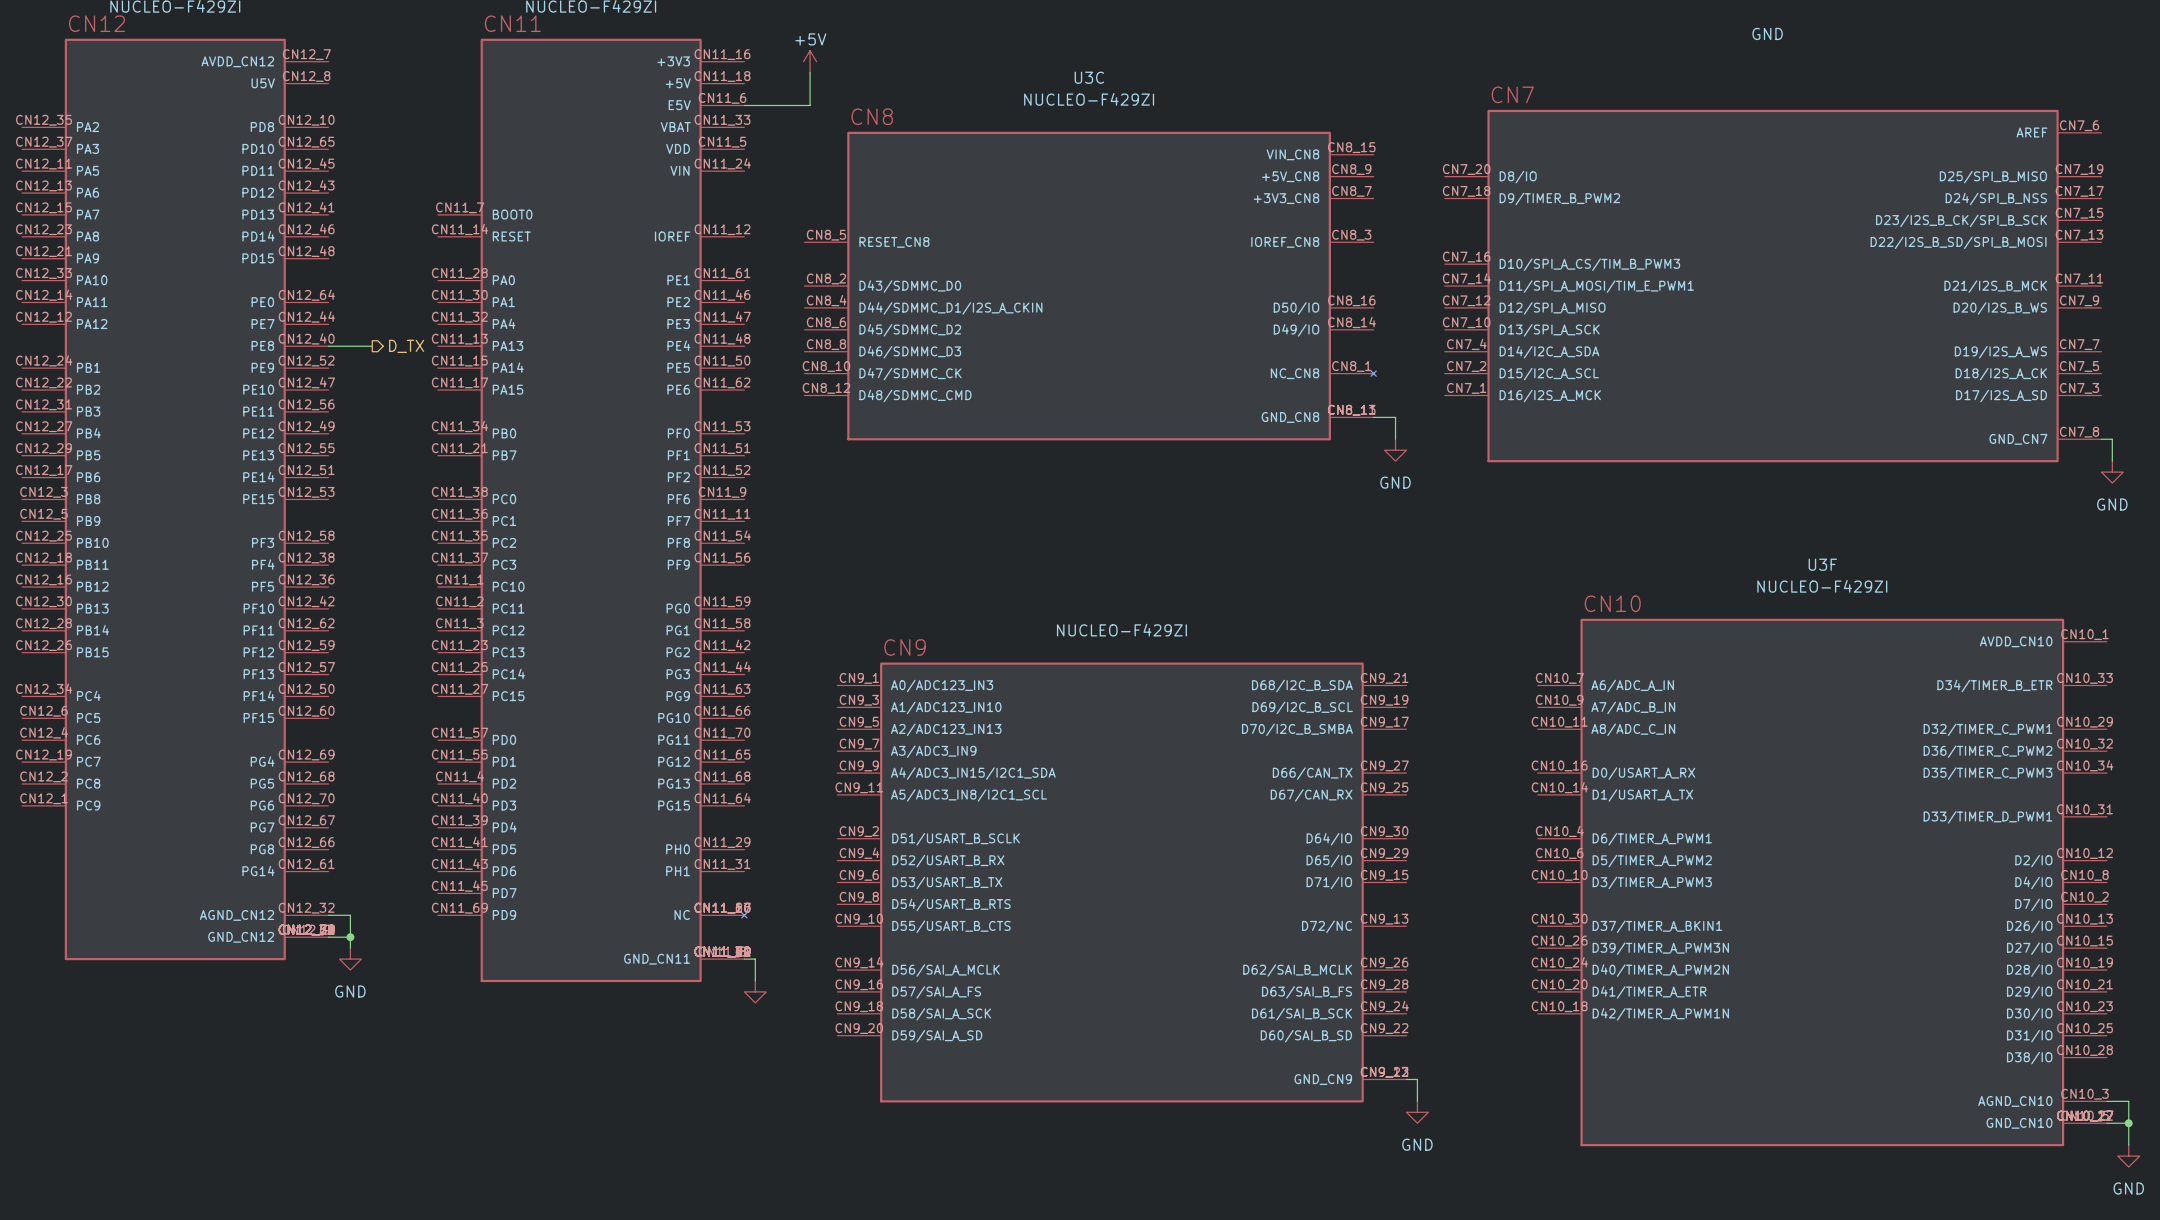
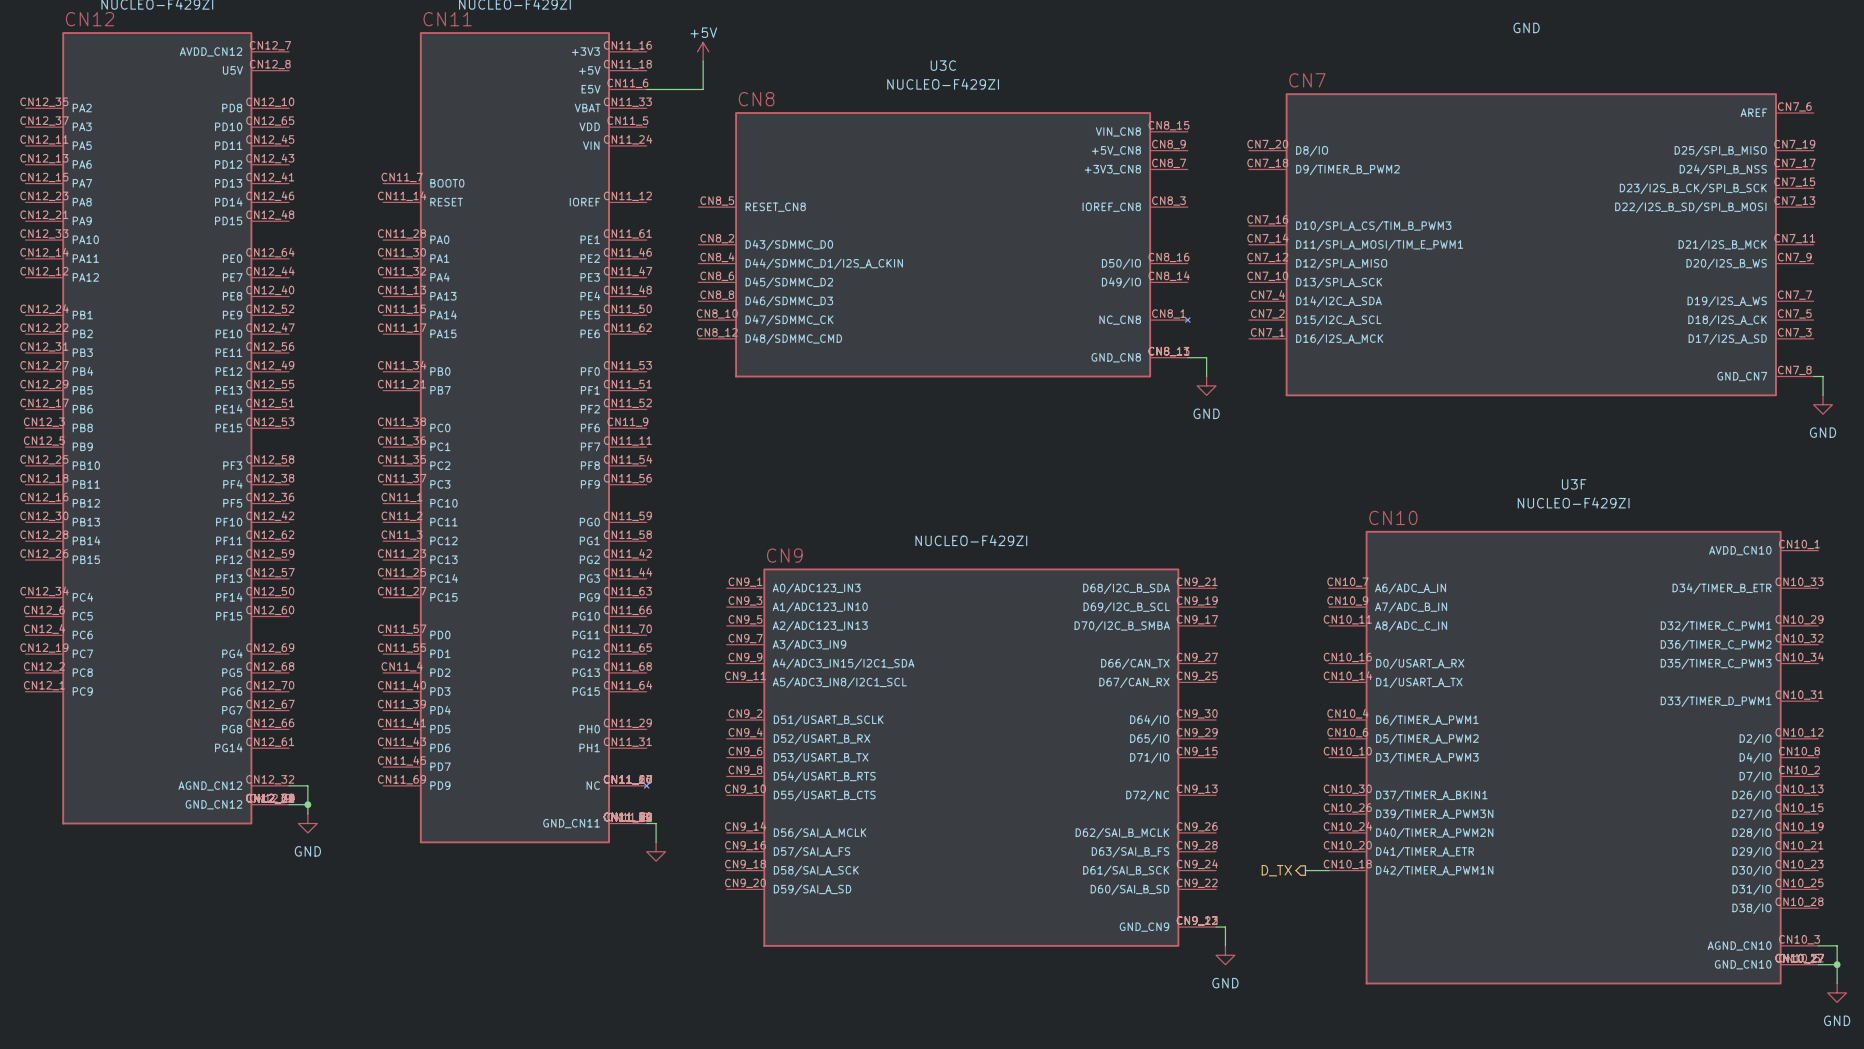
wire: (328, 346) (372, 346) -> none
hierarchical label: D_TX (406, 346) -> none
hierarchical label: none -> D_TX (1276, 870)
wire: none -> (1305, 870) (1328, 870)

